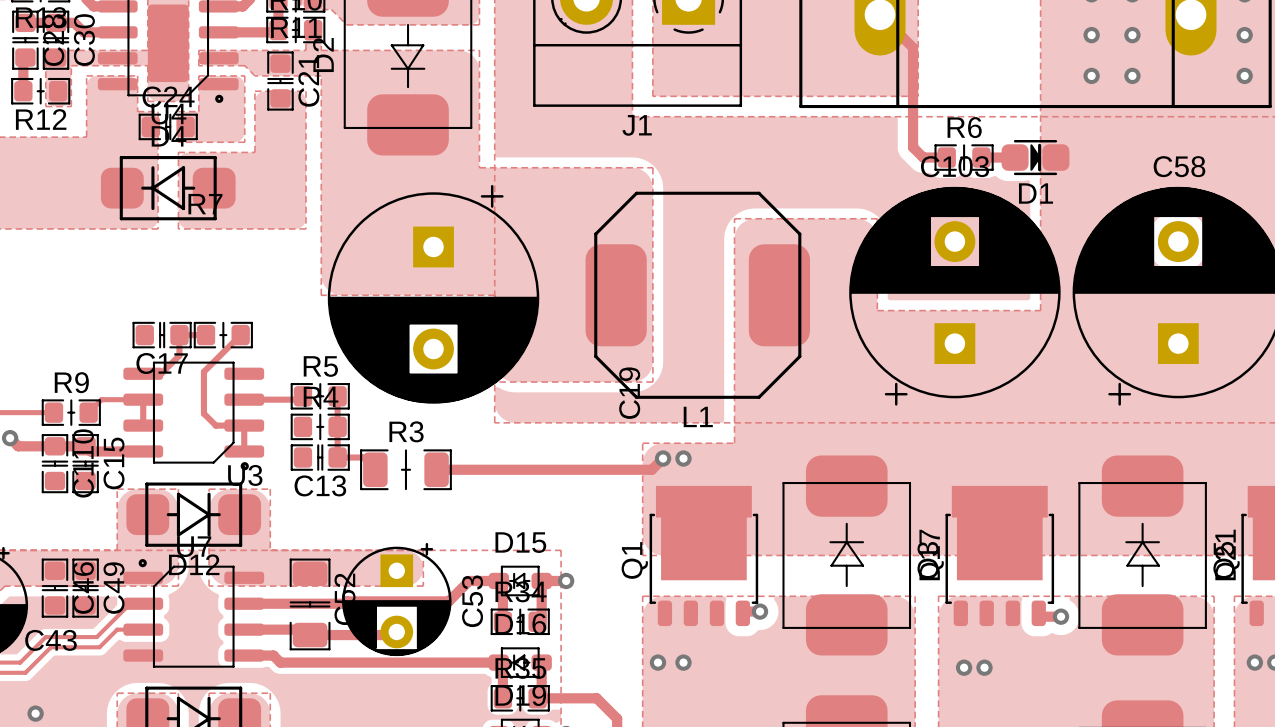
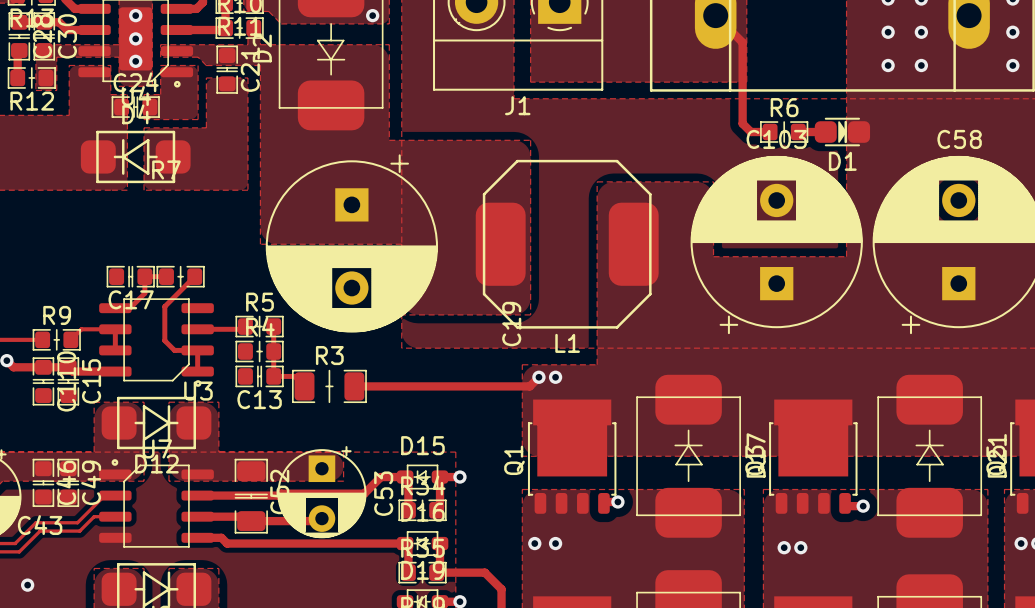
via: none -> (135, 15)
via: none -> (372, 15)
via: none -> (135, 38)
via: none -> (135, 61)

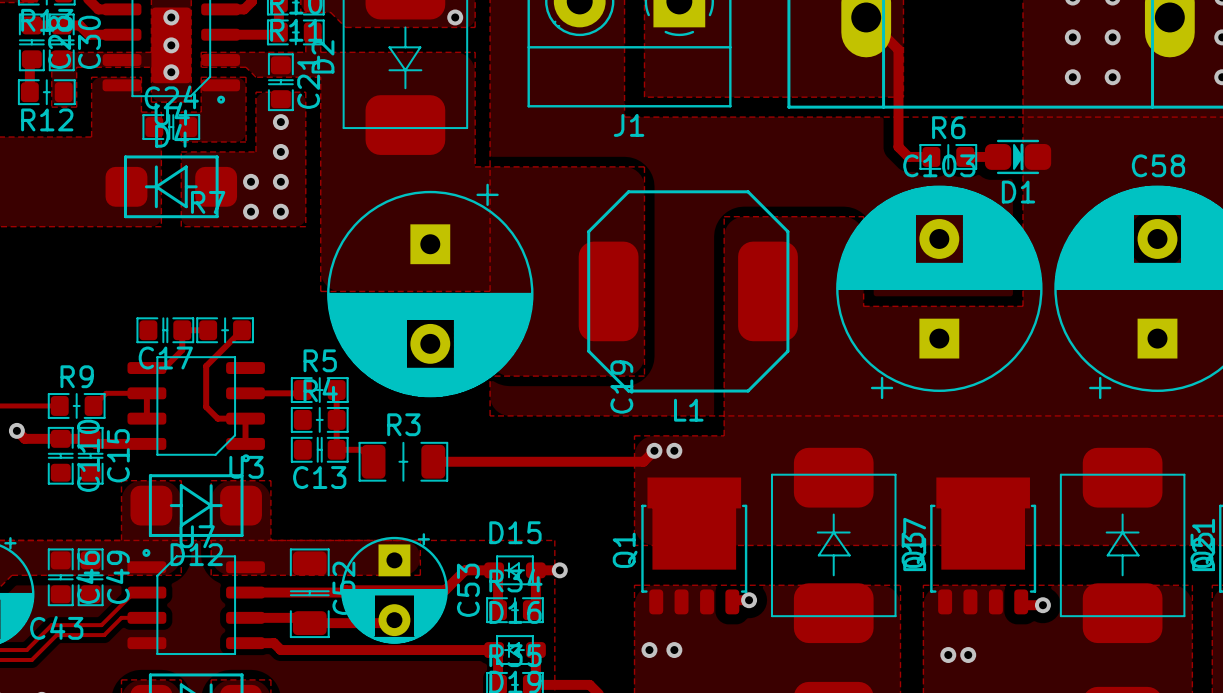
via: none -> (280, 122)
via: none -> (280, 151)
via: none -> (251, 181)
via: none -> (280, 181)
via: none -> (251, 211)
via: none -> (280, 211)

